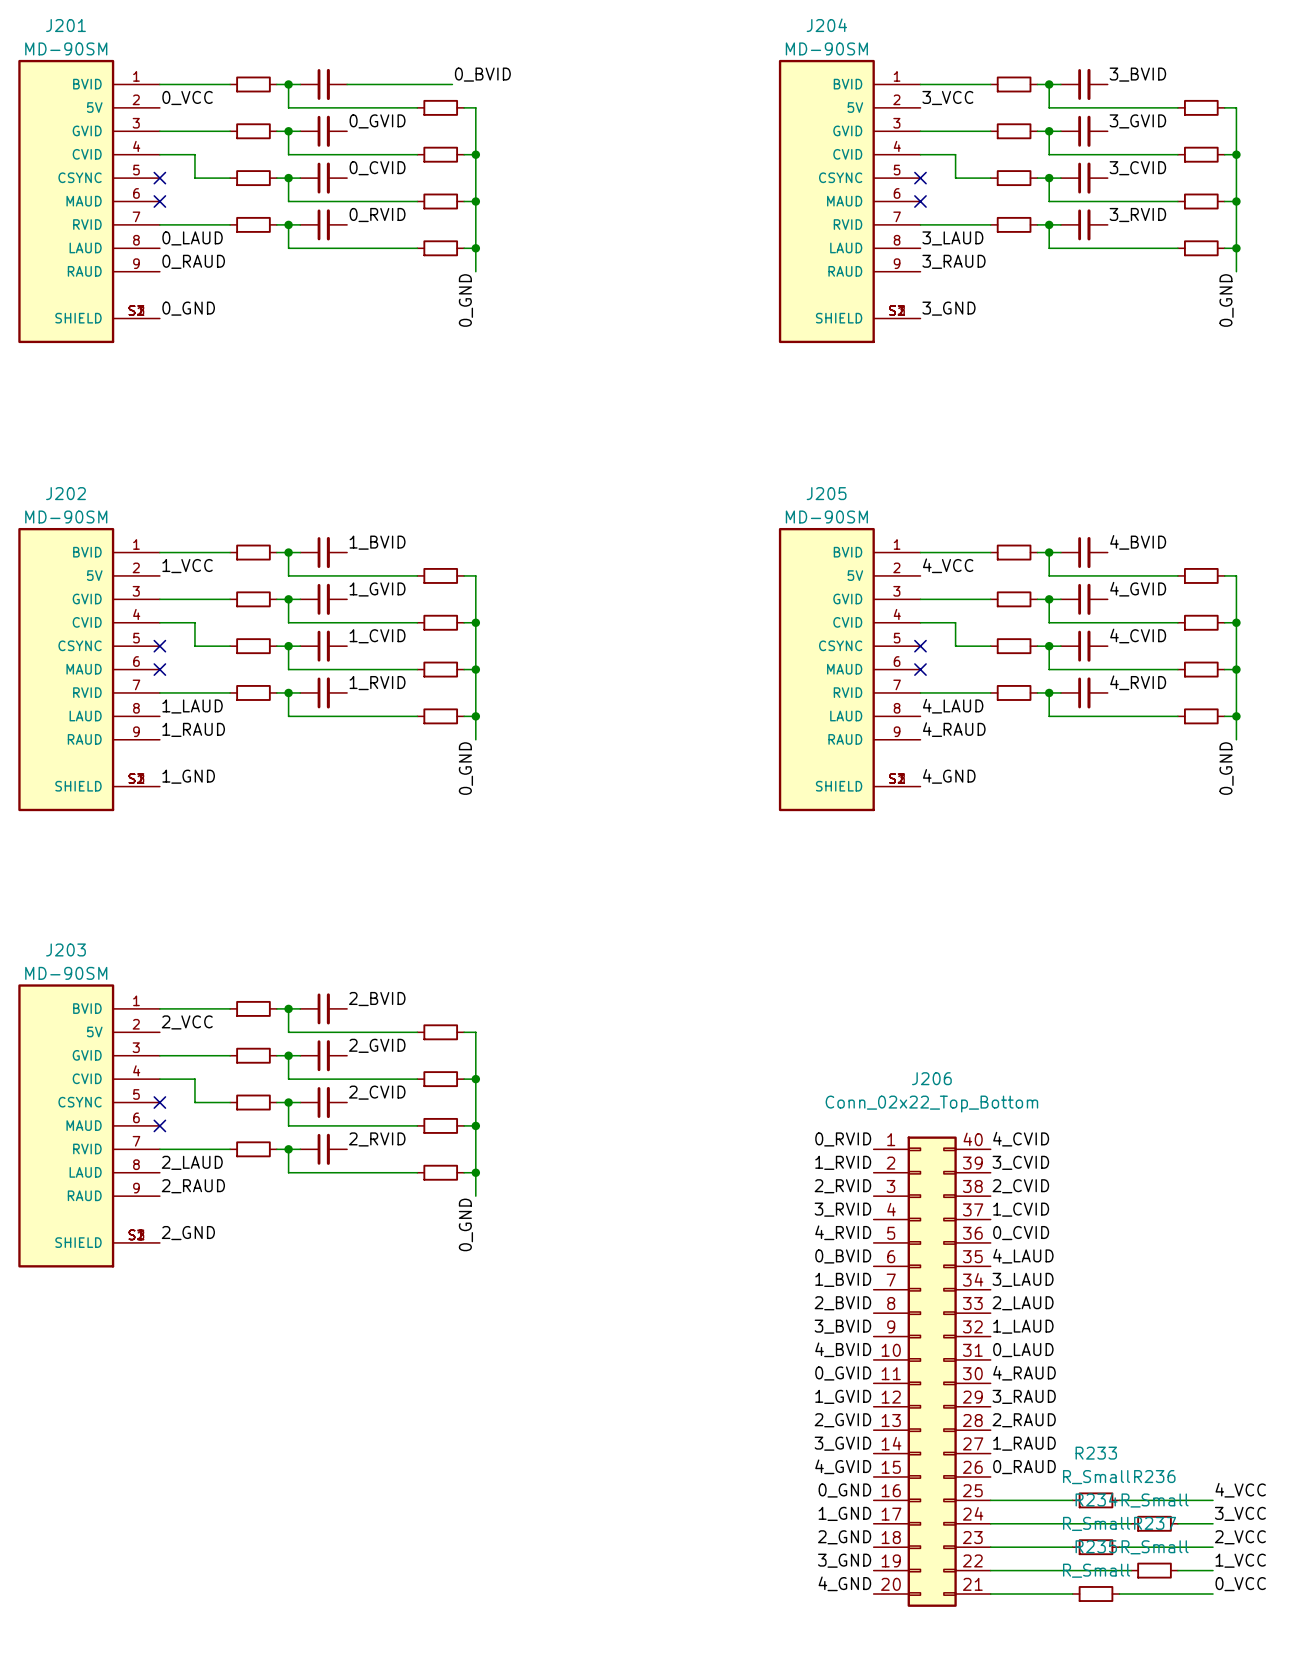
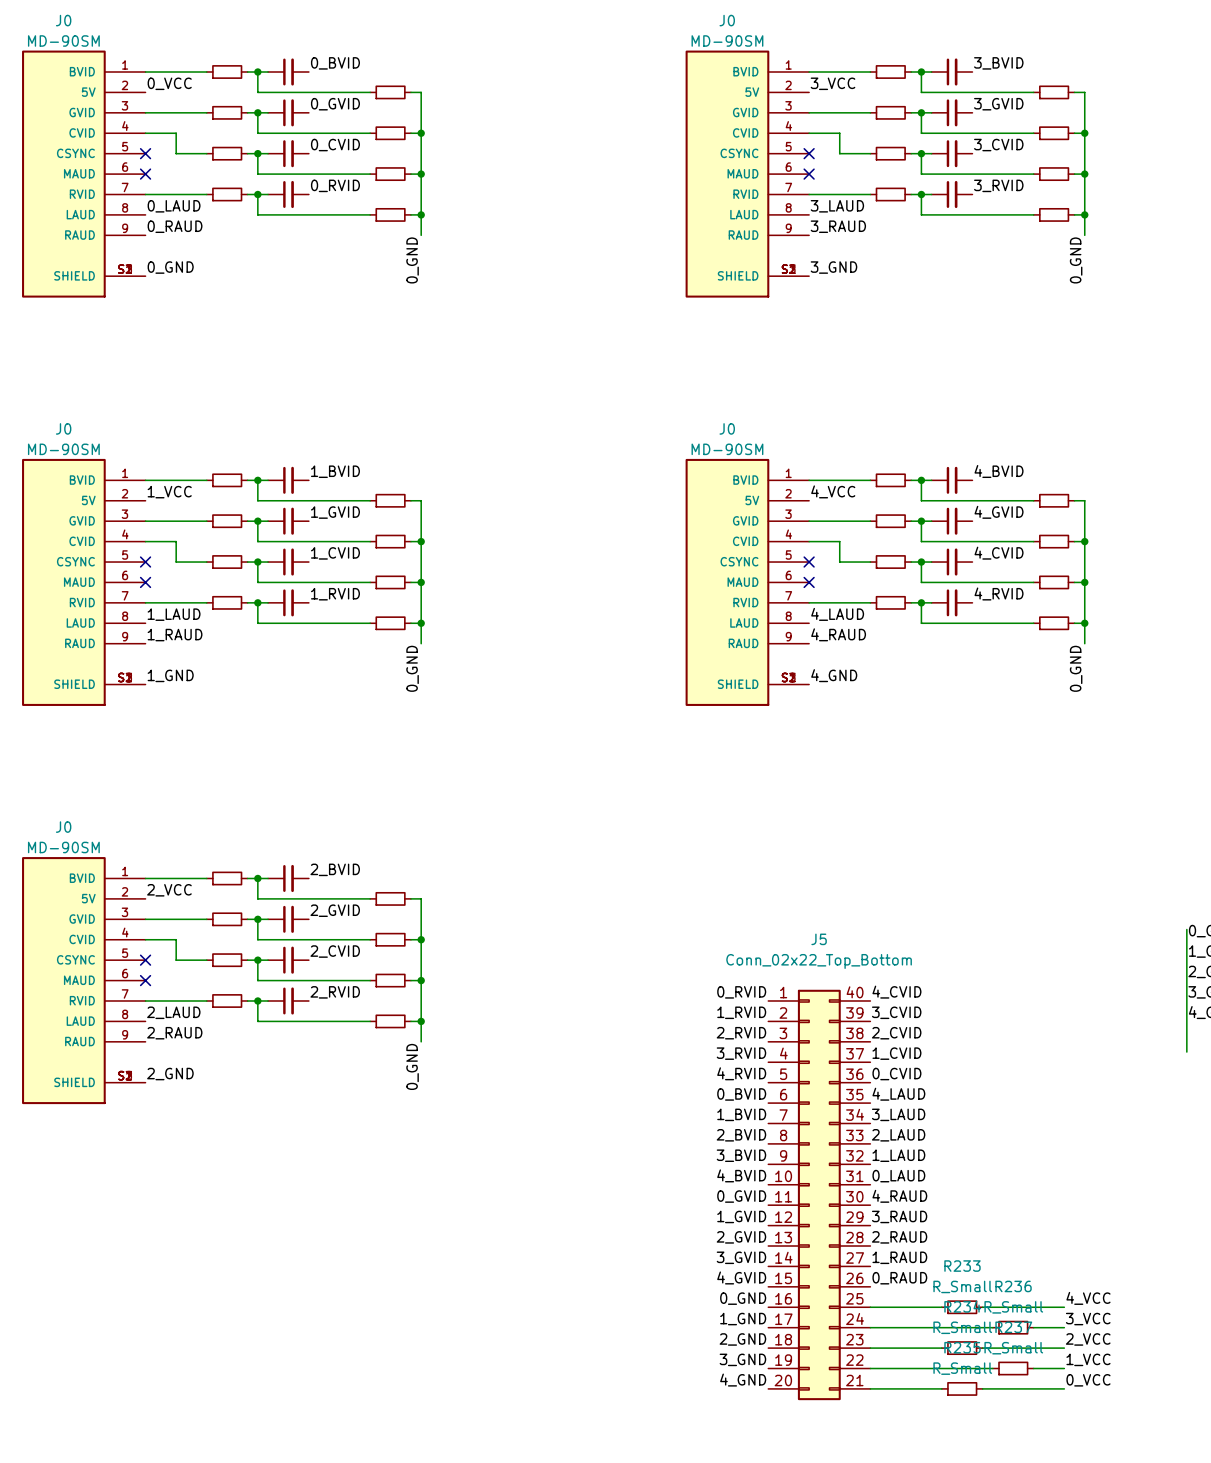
J201 name: J201 (65, 25) -> J0 (63, 20)
J204 name: J204 (826, 25) -> J0 (727, 20)
label position: 0_BVID (482, 74) -> 0_BVID (335, 63)
wire: (347, 84) (452, 84) -> none
J202 name: J202 (65, 493) -> J0 (63, 428)
J205 name: J205 (826, 493) -> J0 (727, 428)
J203 name: J203 (65, 949) -> J0 (63, 827)
J206 name: J206 (931, 1078) -> J5 (819, 939)

